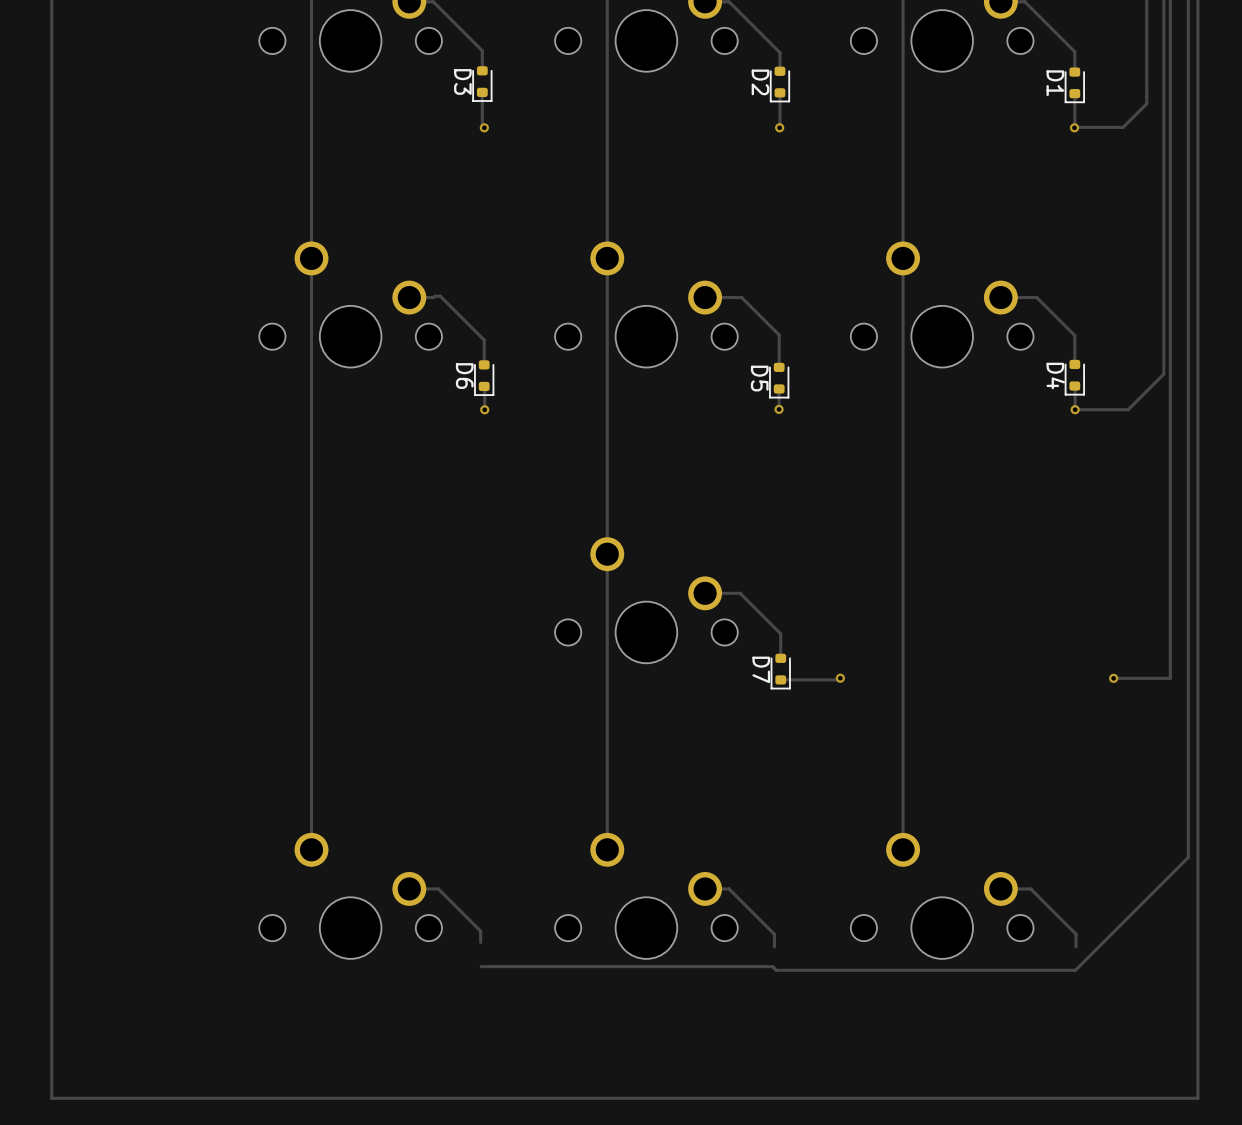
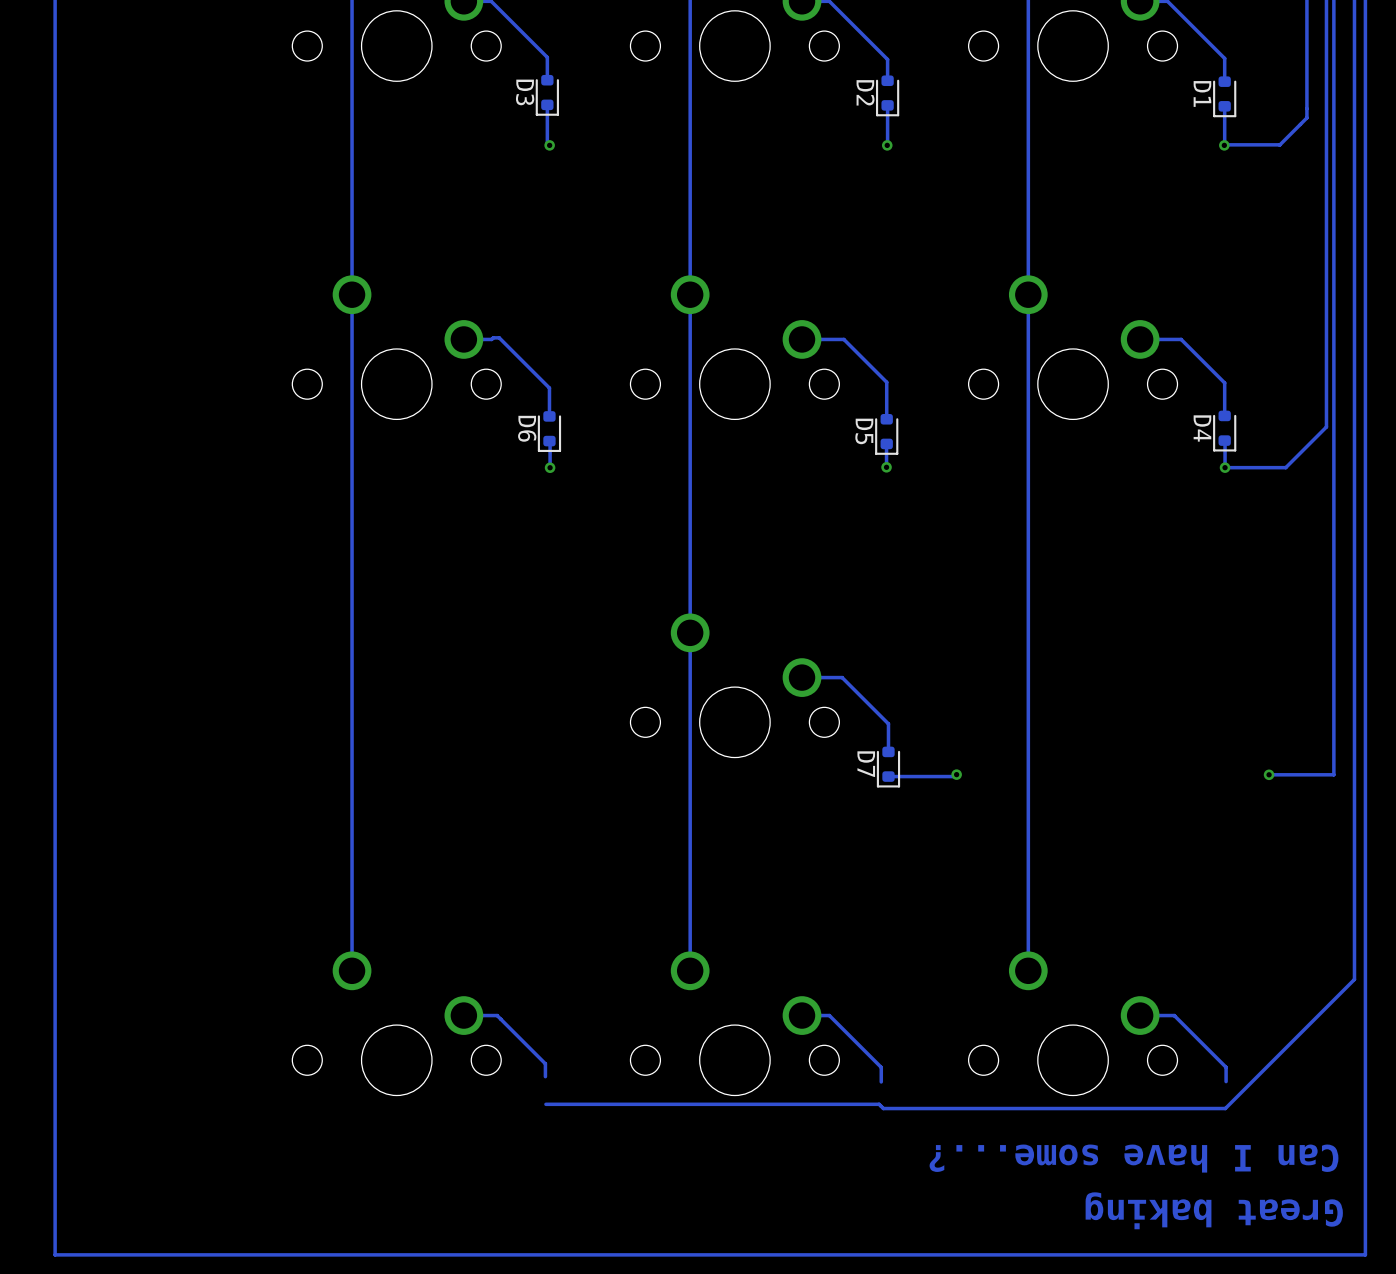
text: none -> Can I have some...? (1133, 1158)
text: none -> Great baking (1214, 1210)

